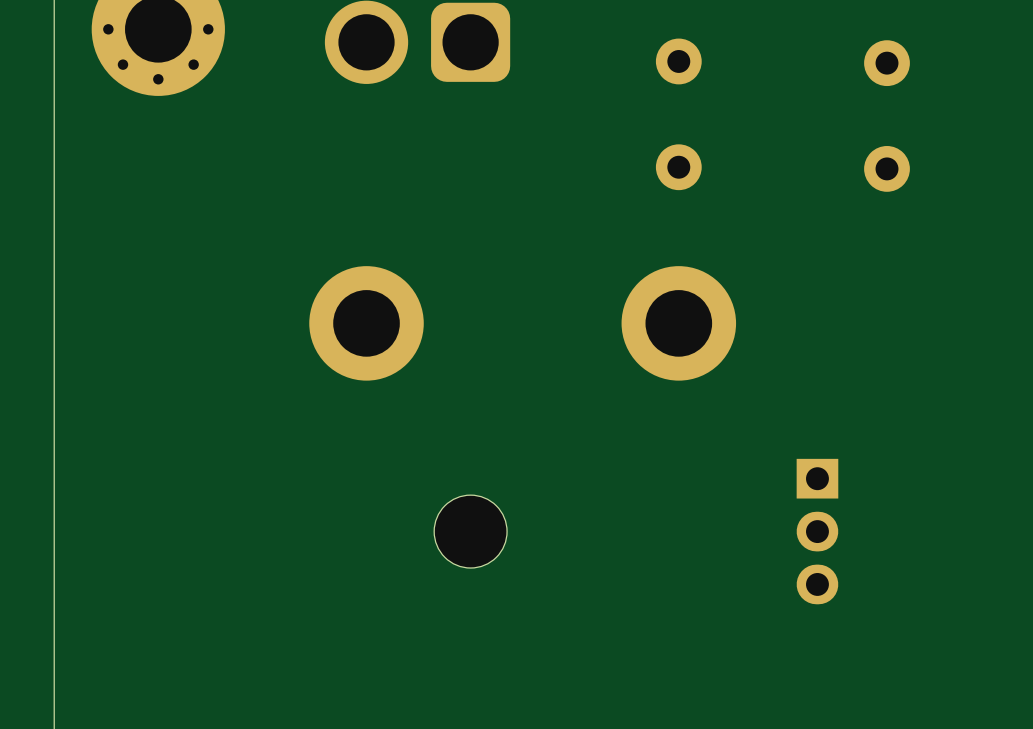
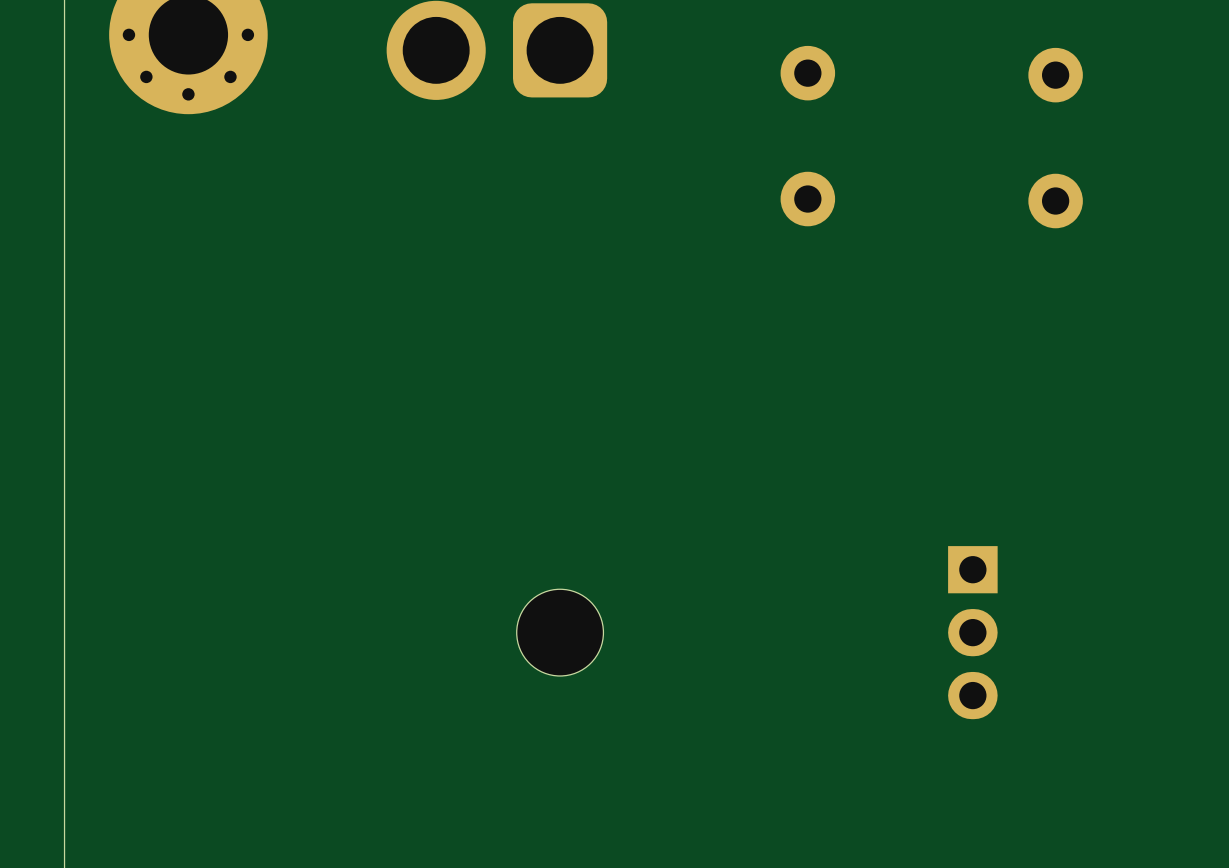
part: (366, 323) -> none
part: (678, 323) -> none

